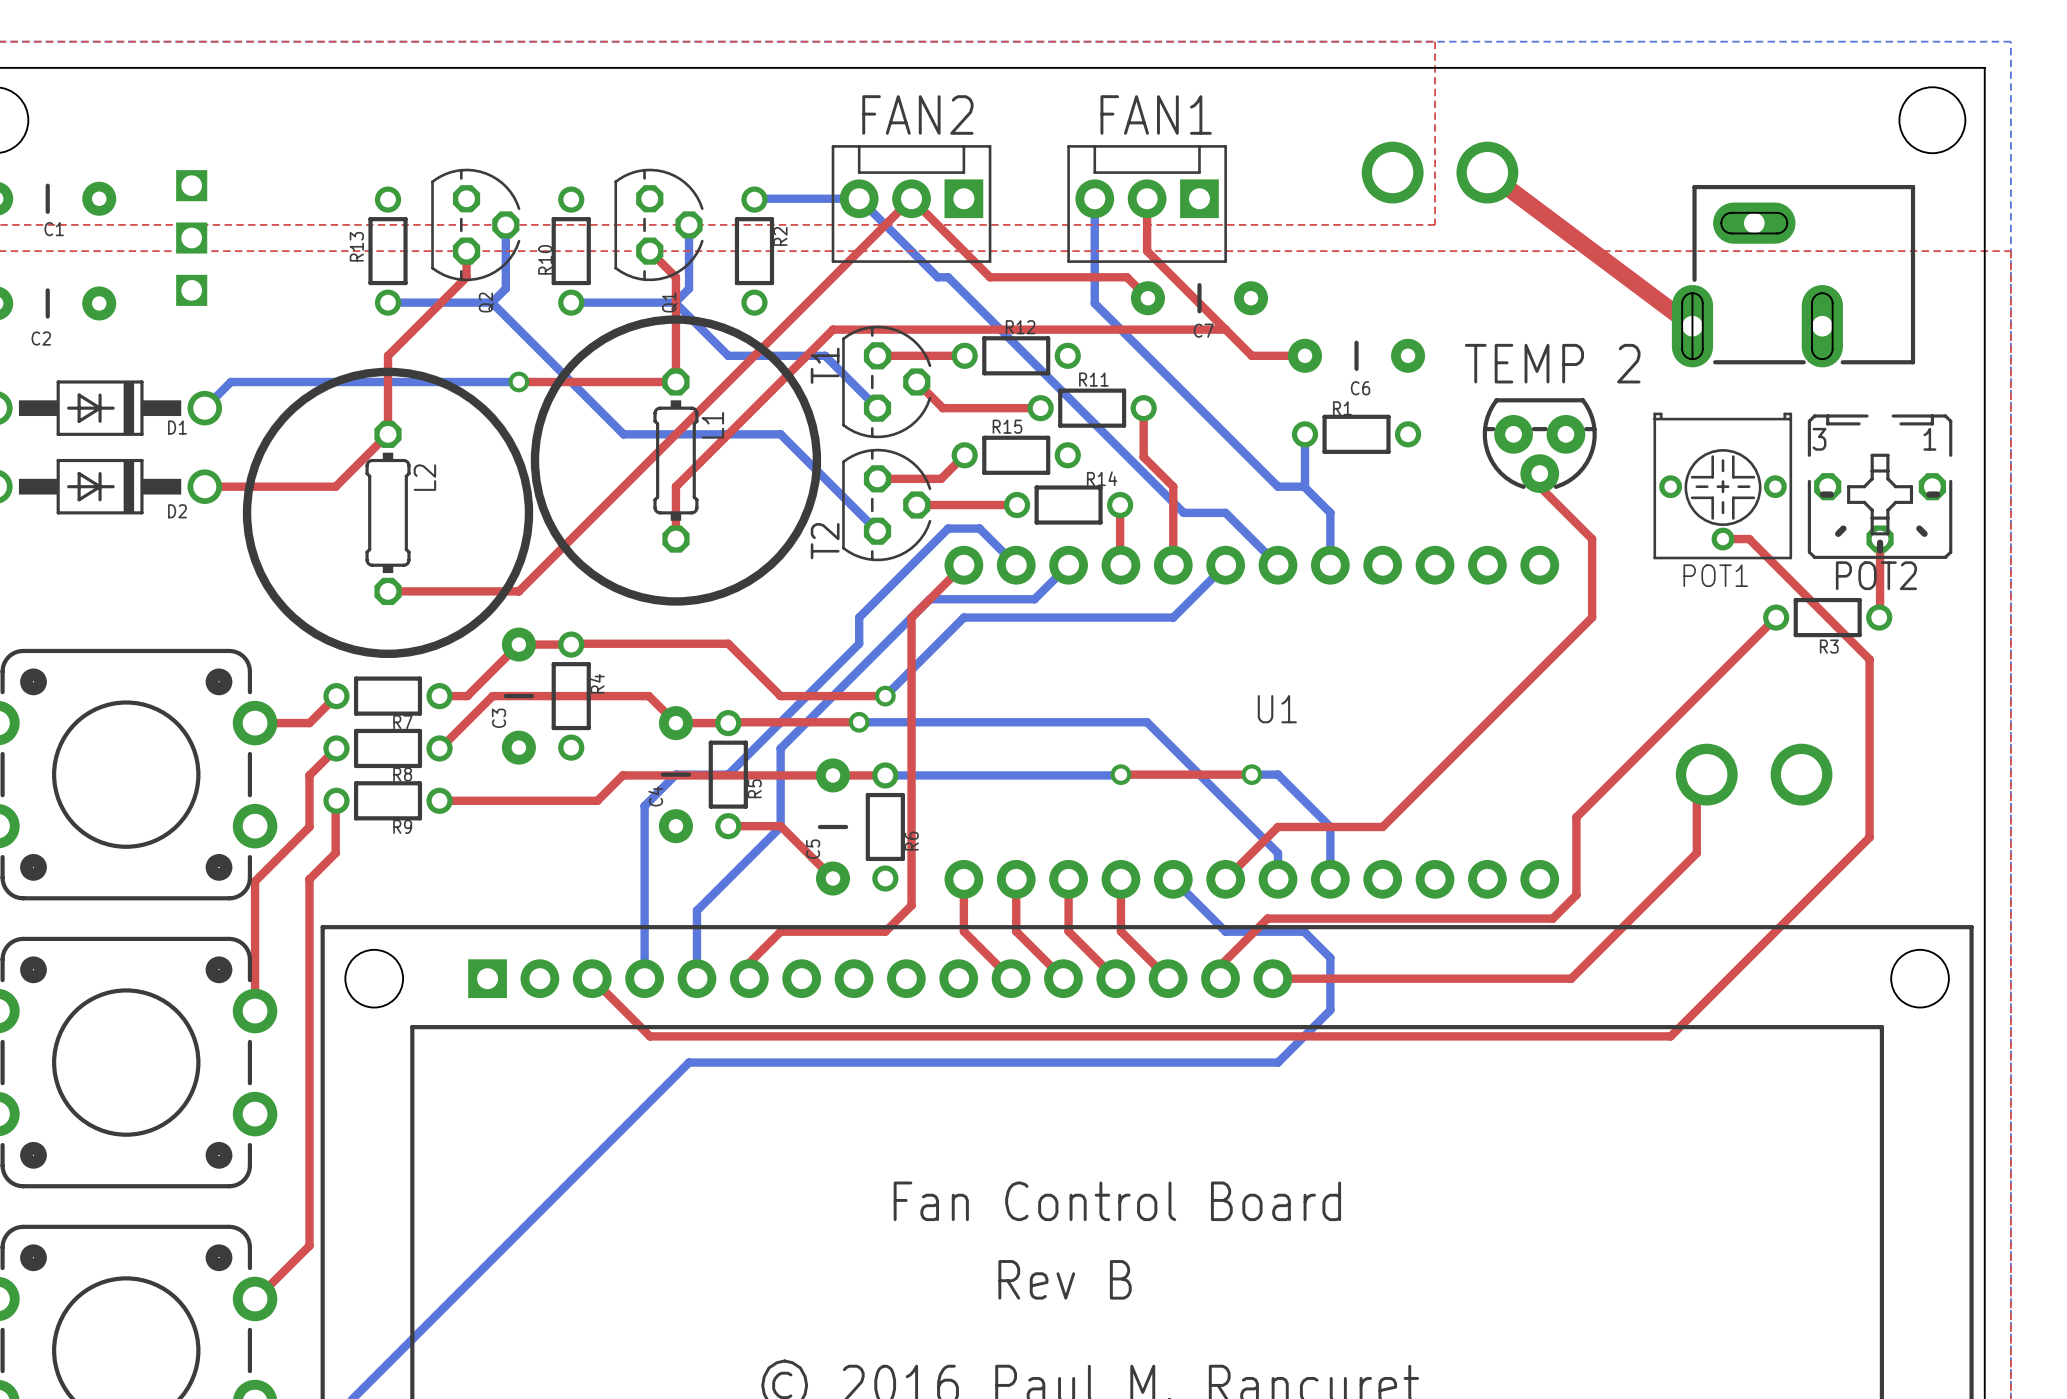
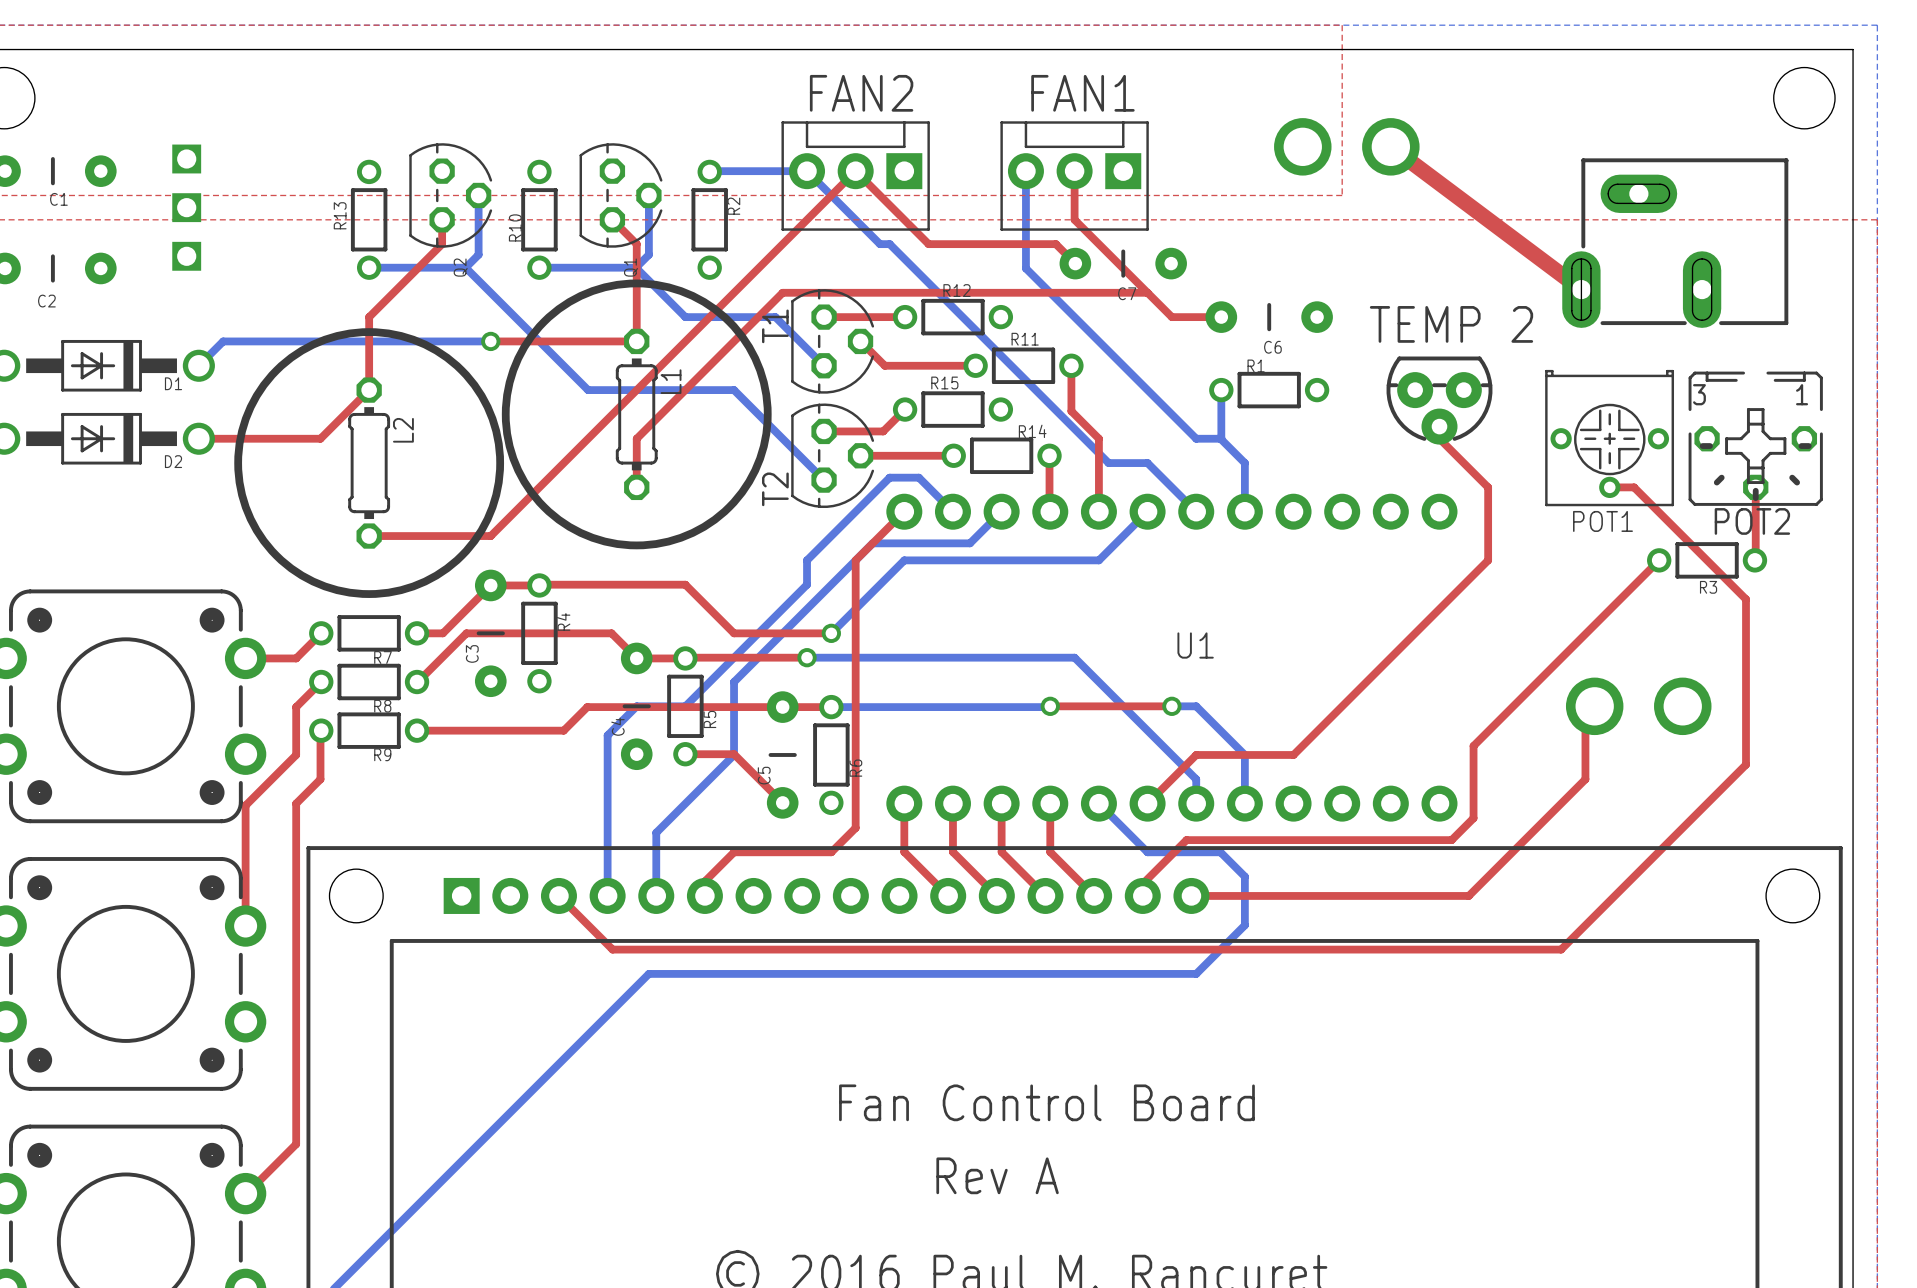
text: Rev B (1065, 1279) -> Rev A (997, 1175)

